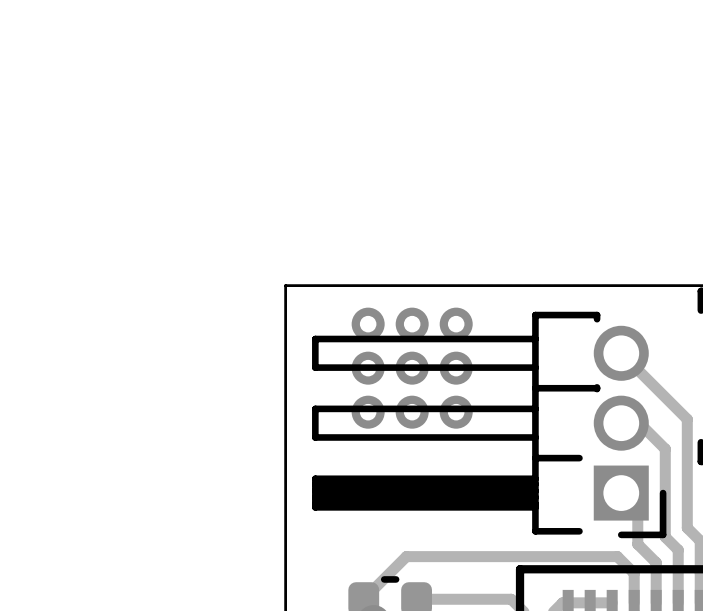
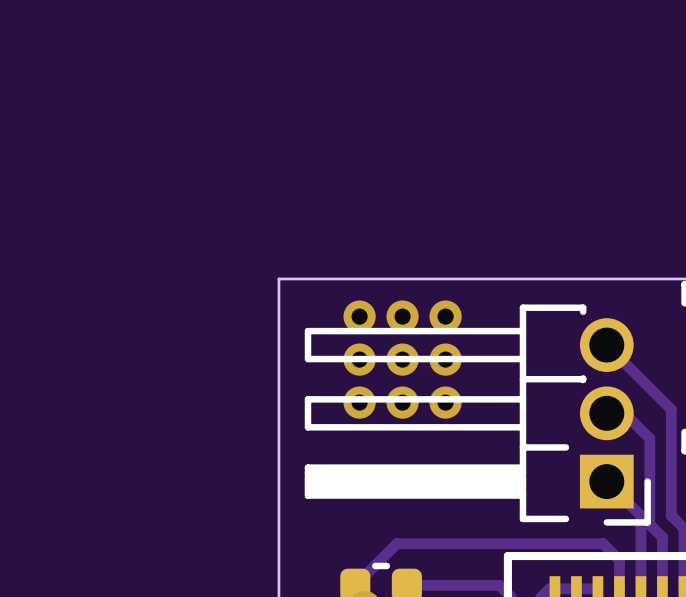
track: (637, 509) (637, 544) (656, 562) -> (622, 497) (640, 515) (640, 549)

